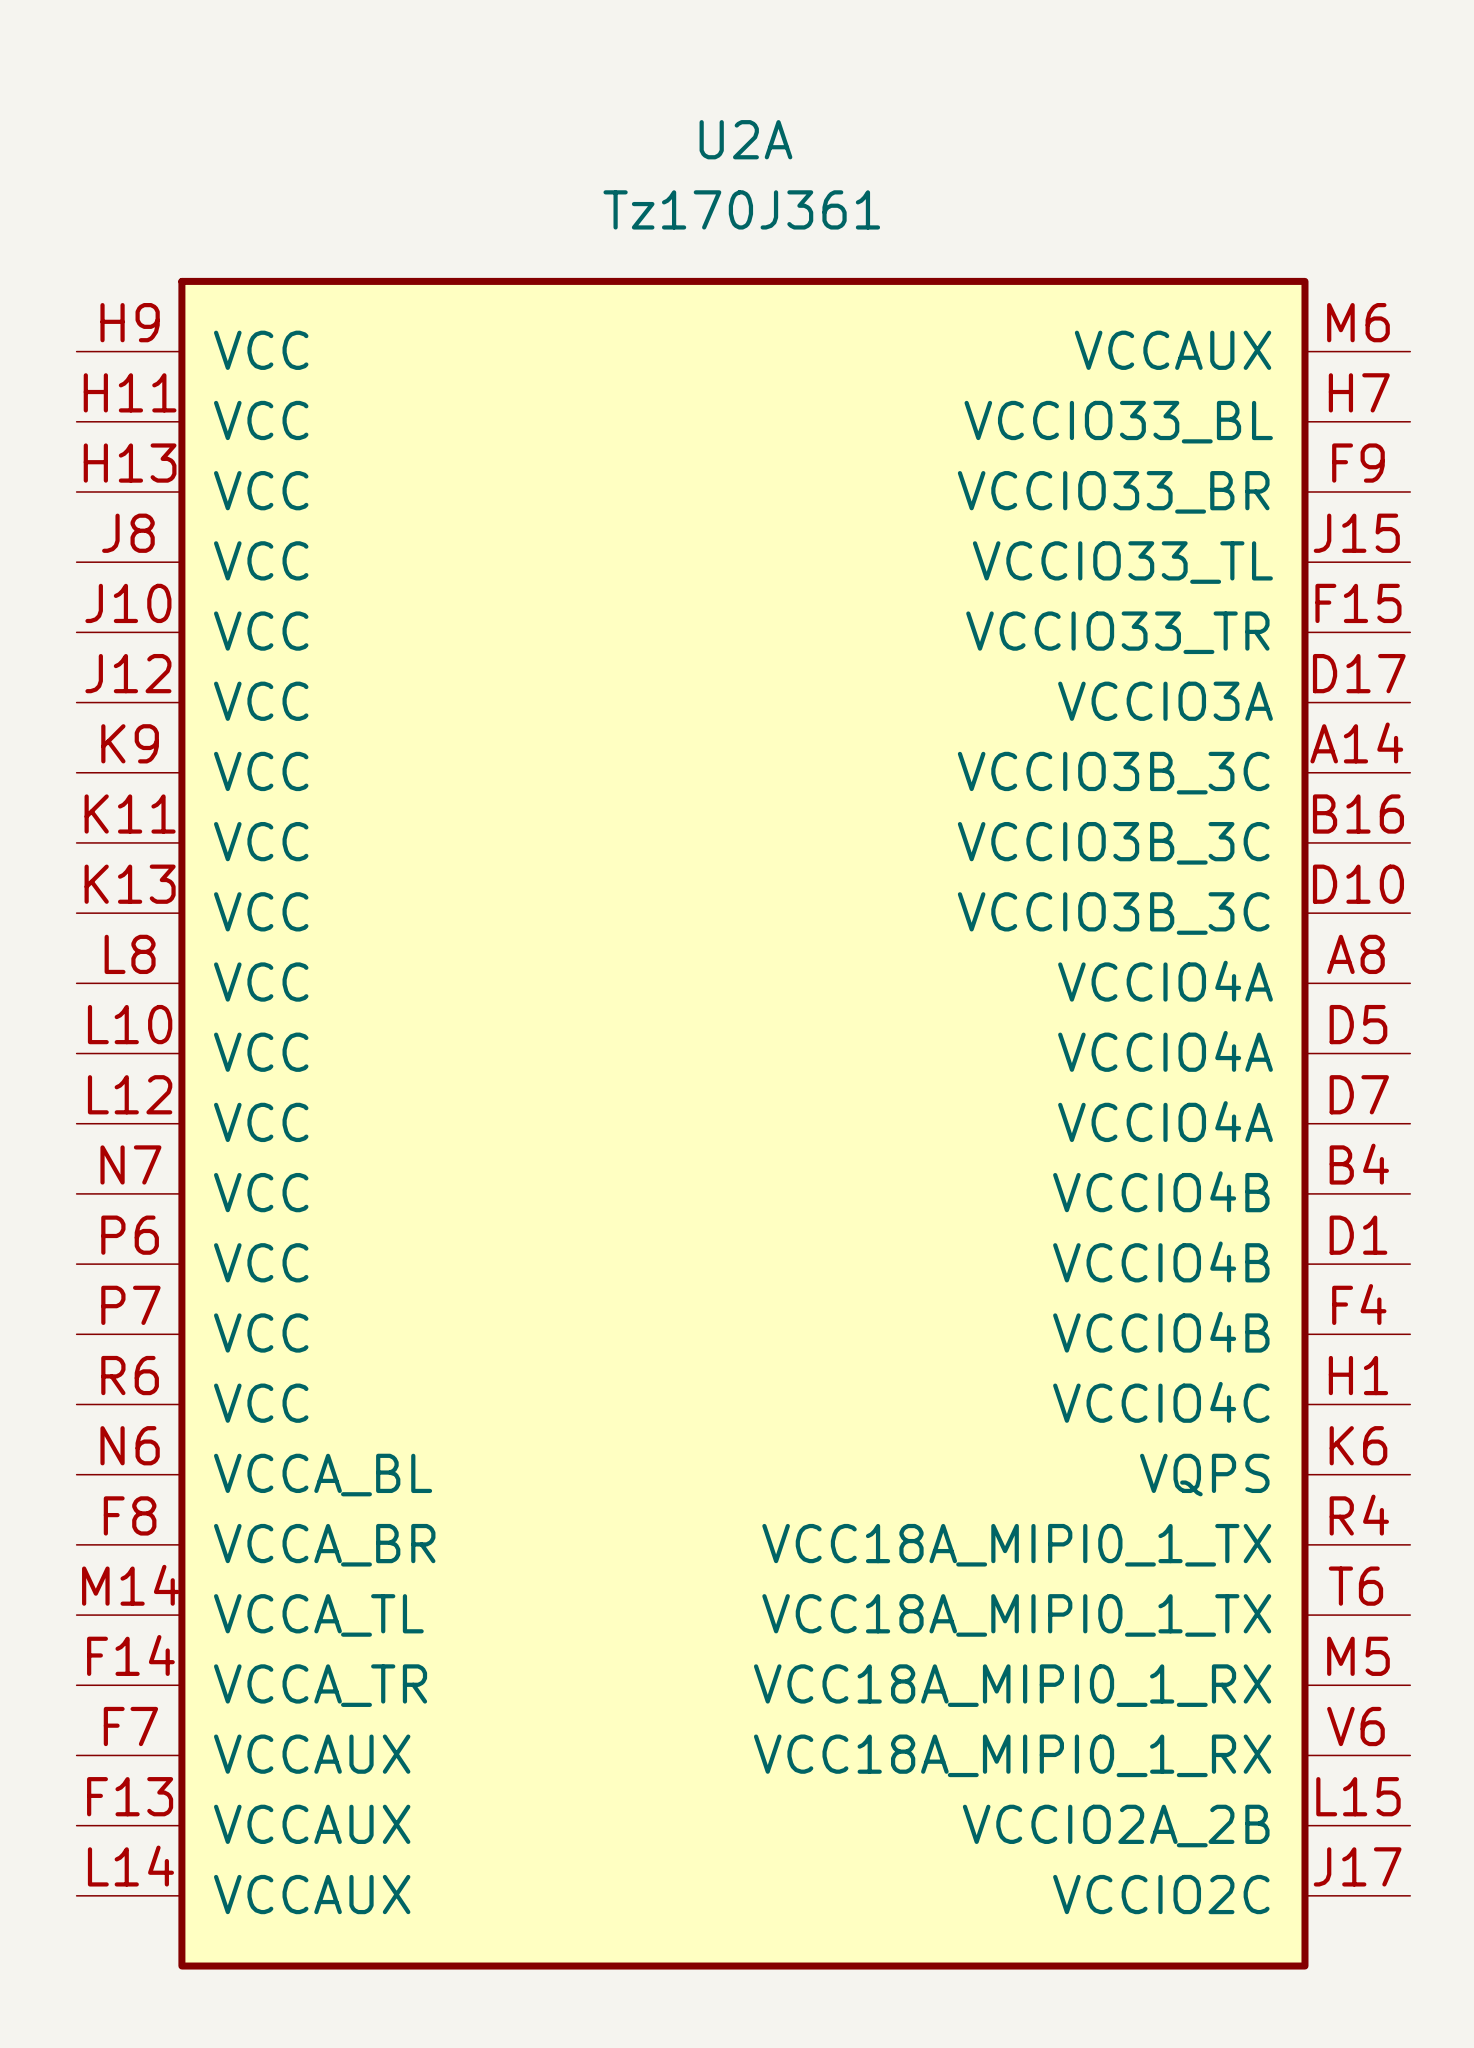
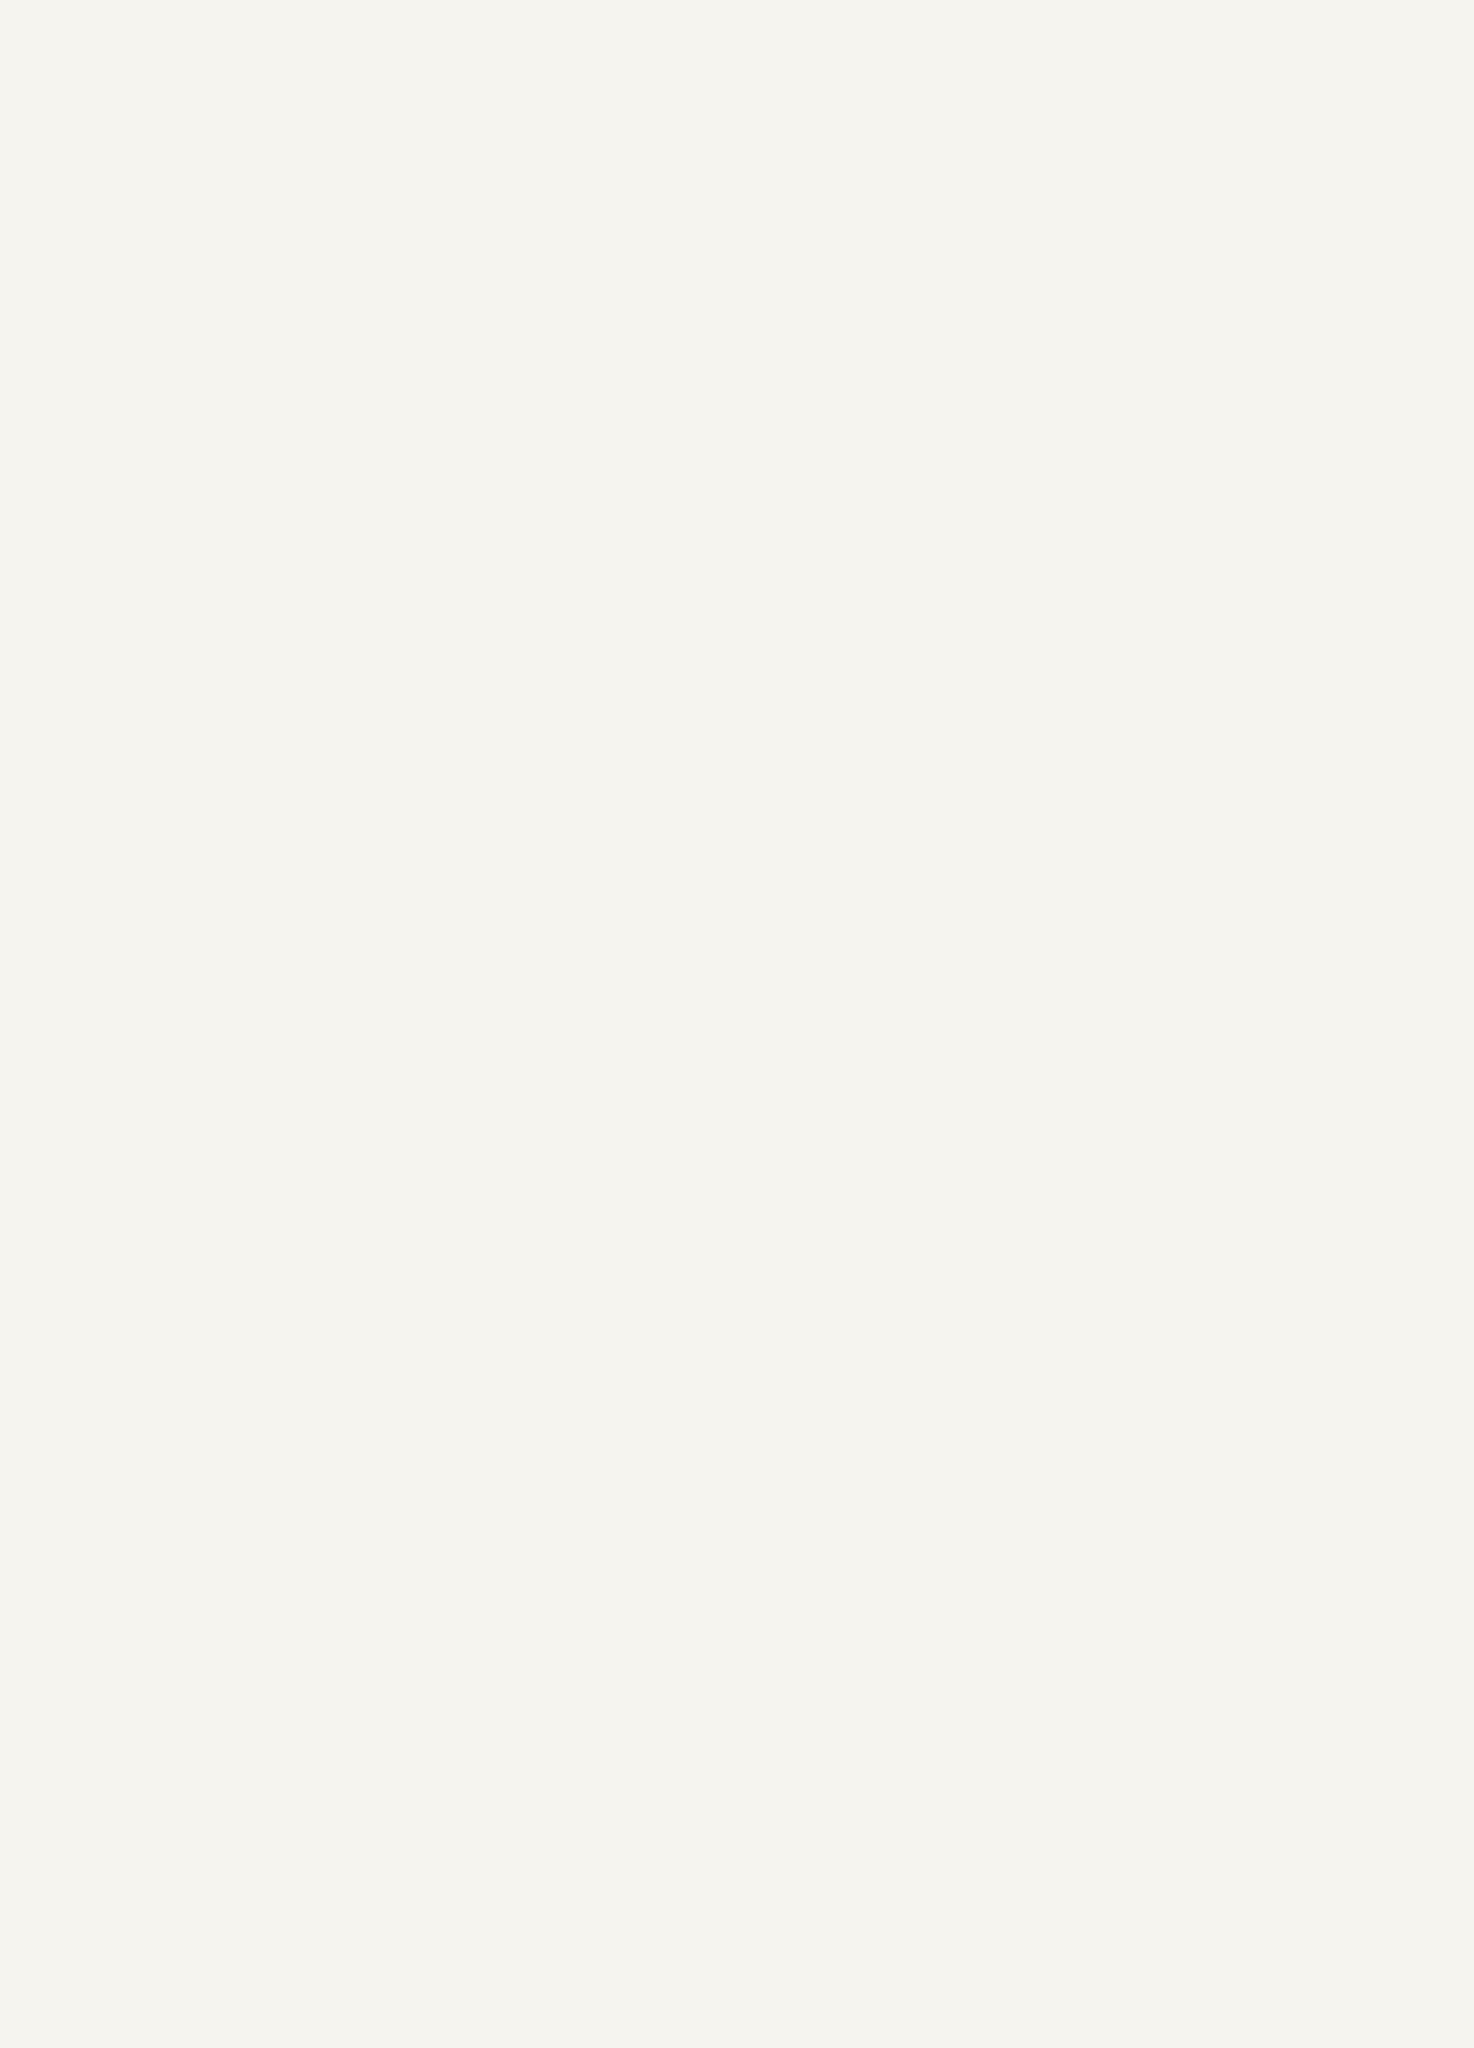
U2A: Tz170J361 (743, 1123) -> none

